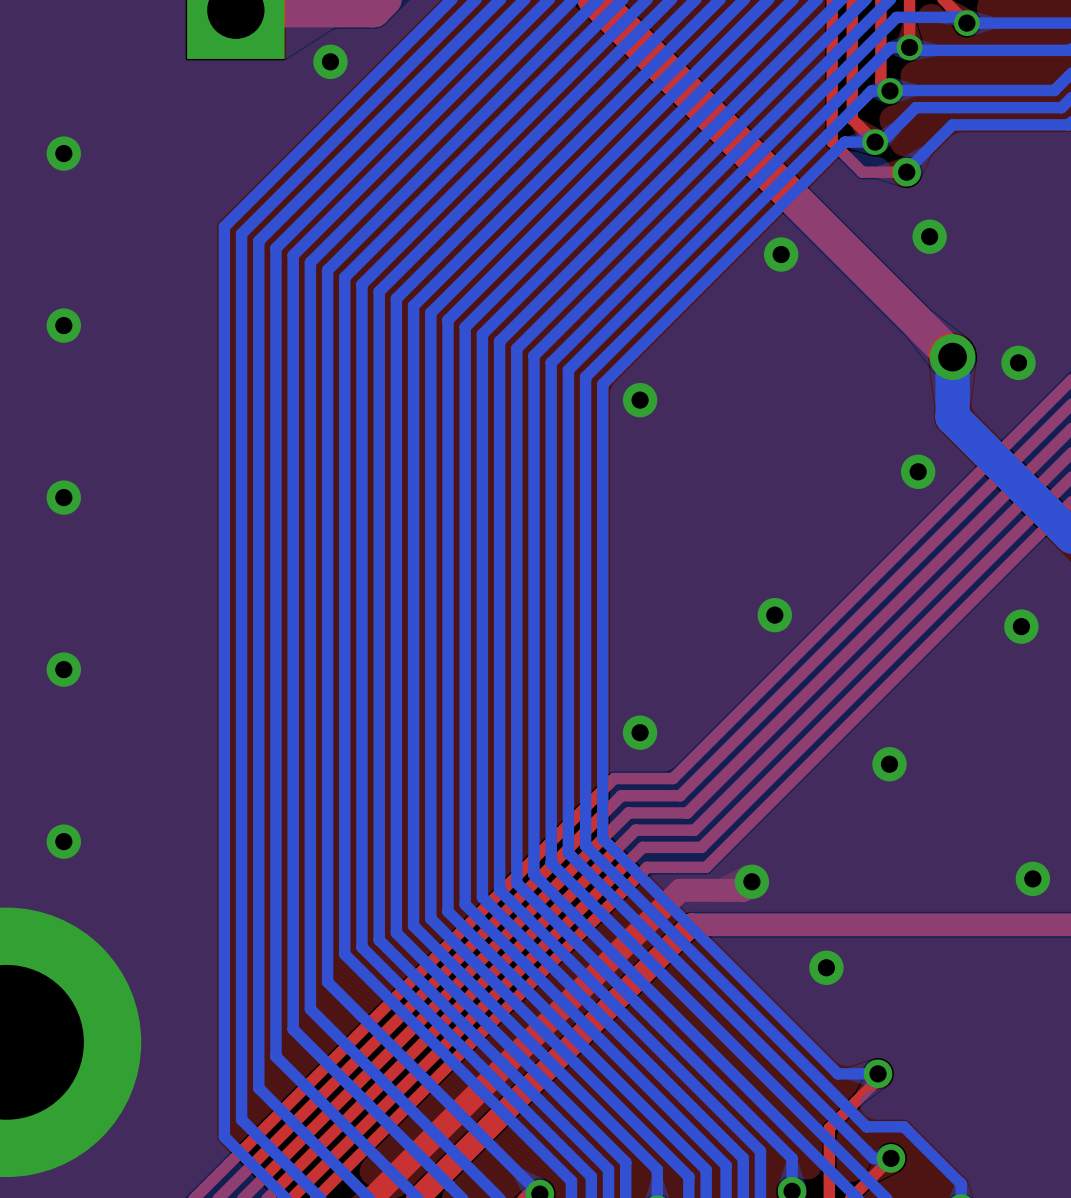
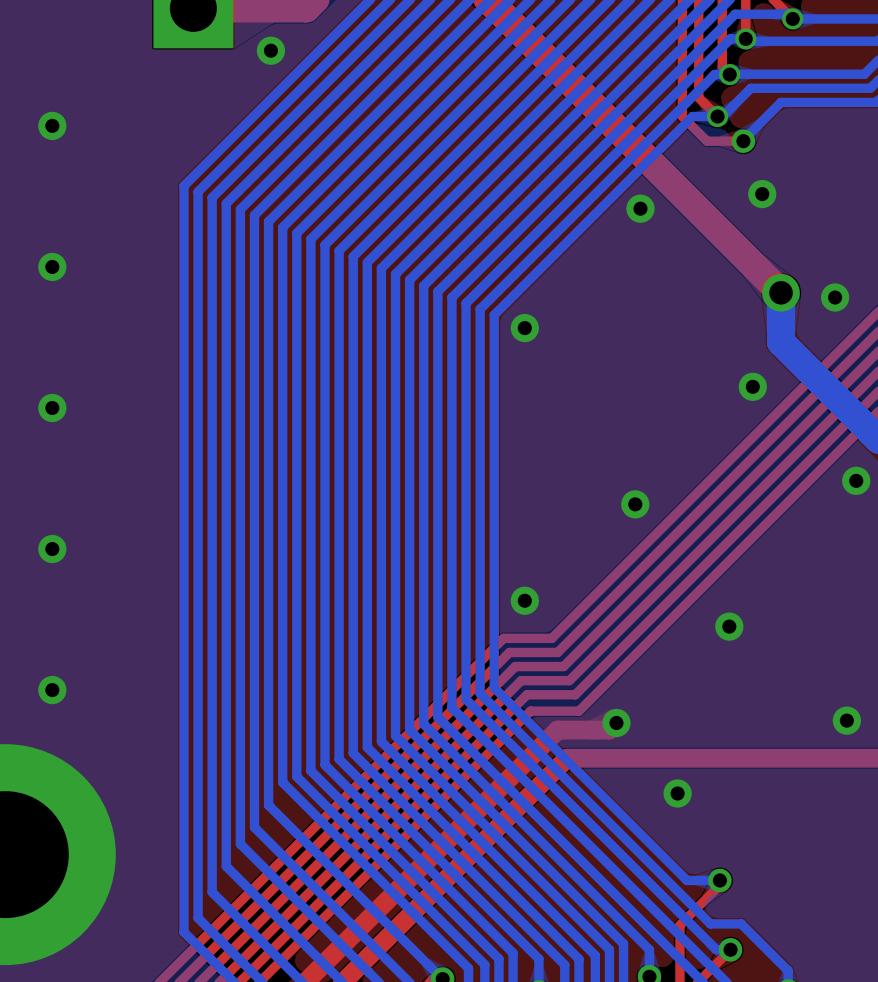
via position: (1021, 626) -> (856, 480)

